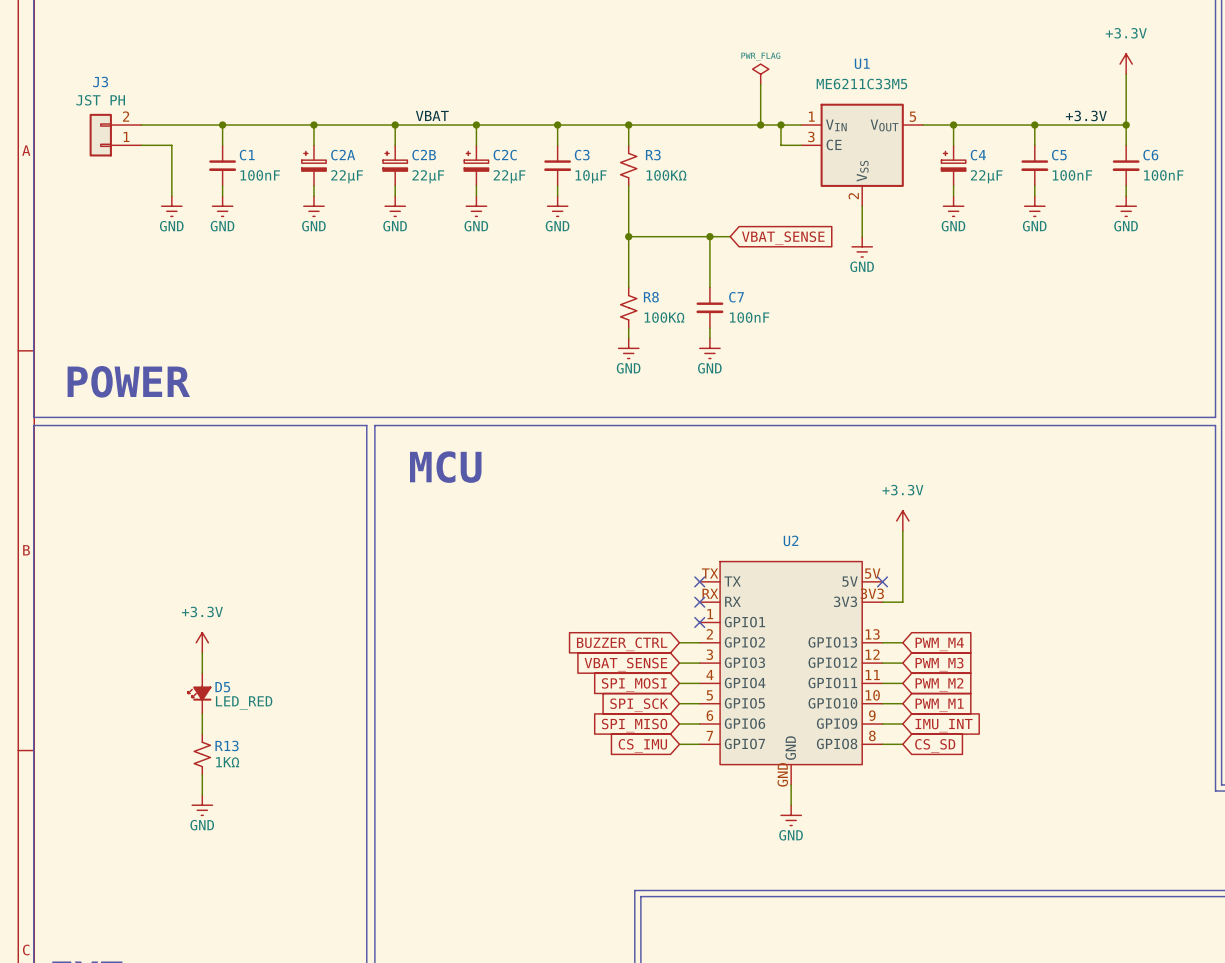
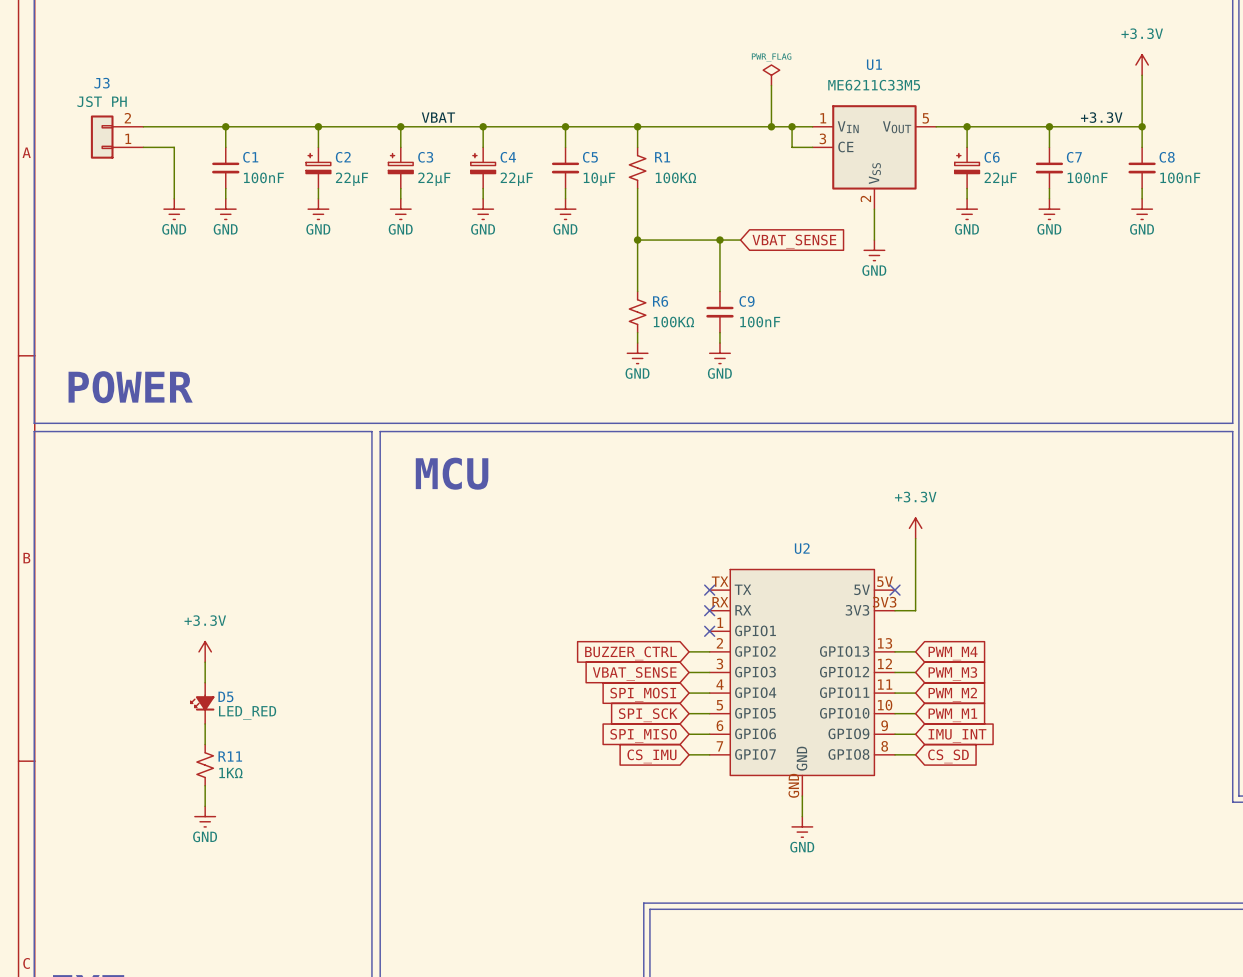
C2A name: C2A (343, 155) -> C2 (343, 157)
C2B name: C2B (424, 155) -> C3 (425, 157)
C2C name: C2C (505, 155) -> C4 (508, 157)
C3 name: C3 (582, 155) -> C5 (590, 157)
R3 name: R3 (653, 155) -> R1 (662, 157)
C4 name: C4 (978, 155) -> C6 (992, 157)
C5 name: C5 (1059, 155) -> C7 (1074, 157)
C6 name: C6 (1150, 155) -> C8 (1167, 157)
R8 name: R8 (651, 297) -> R6 (660, 301)
C7 name: C7 (736, 297) -> C9 (747, 301)
R13 name: R13 (227, 745) -> R11 (230, 756)

